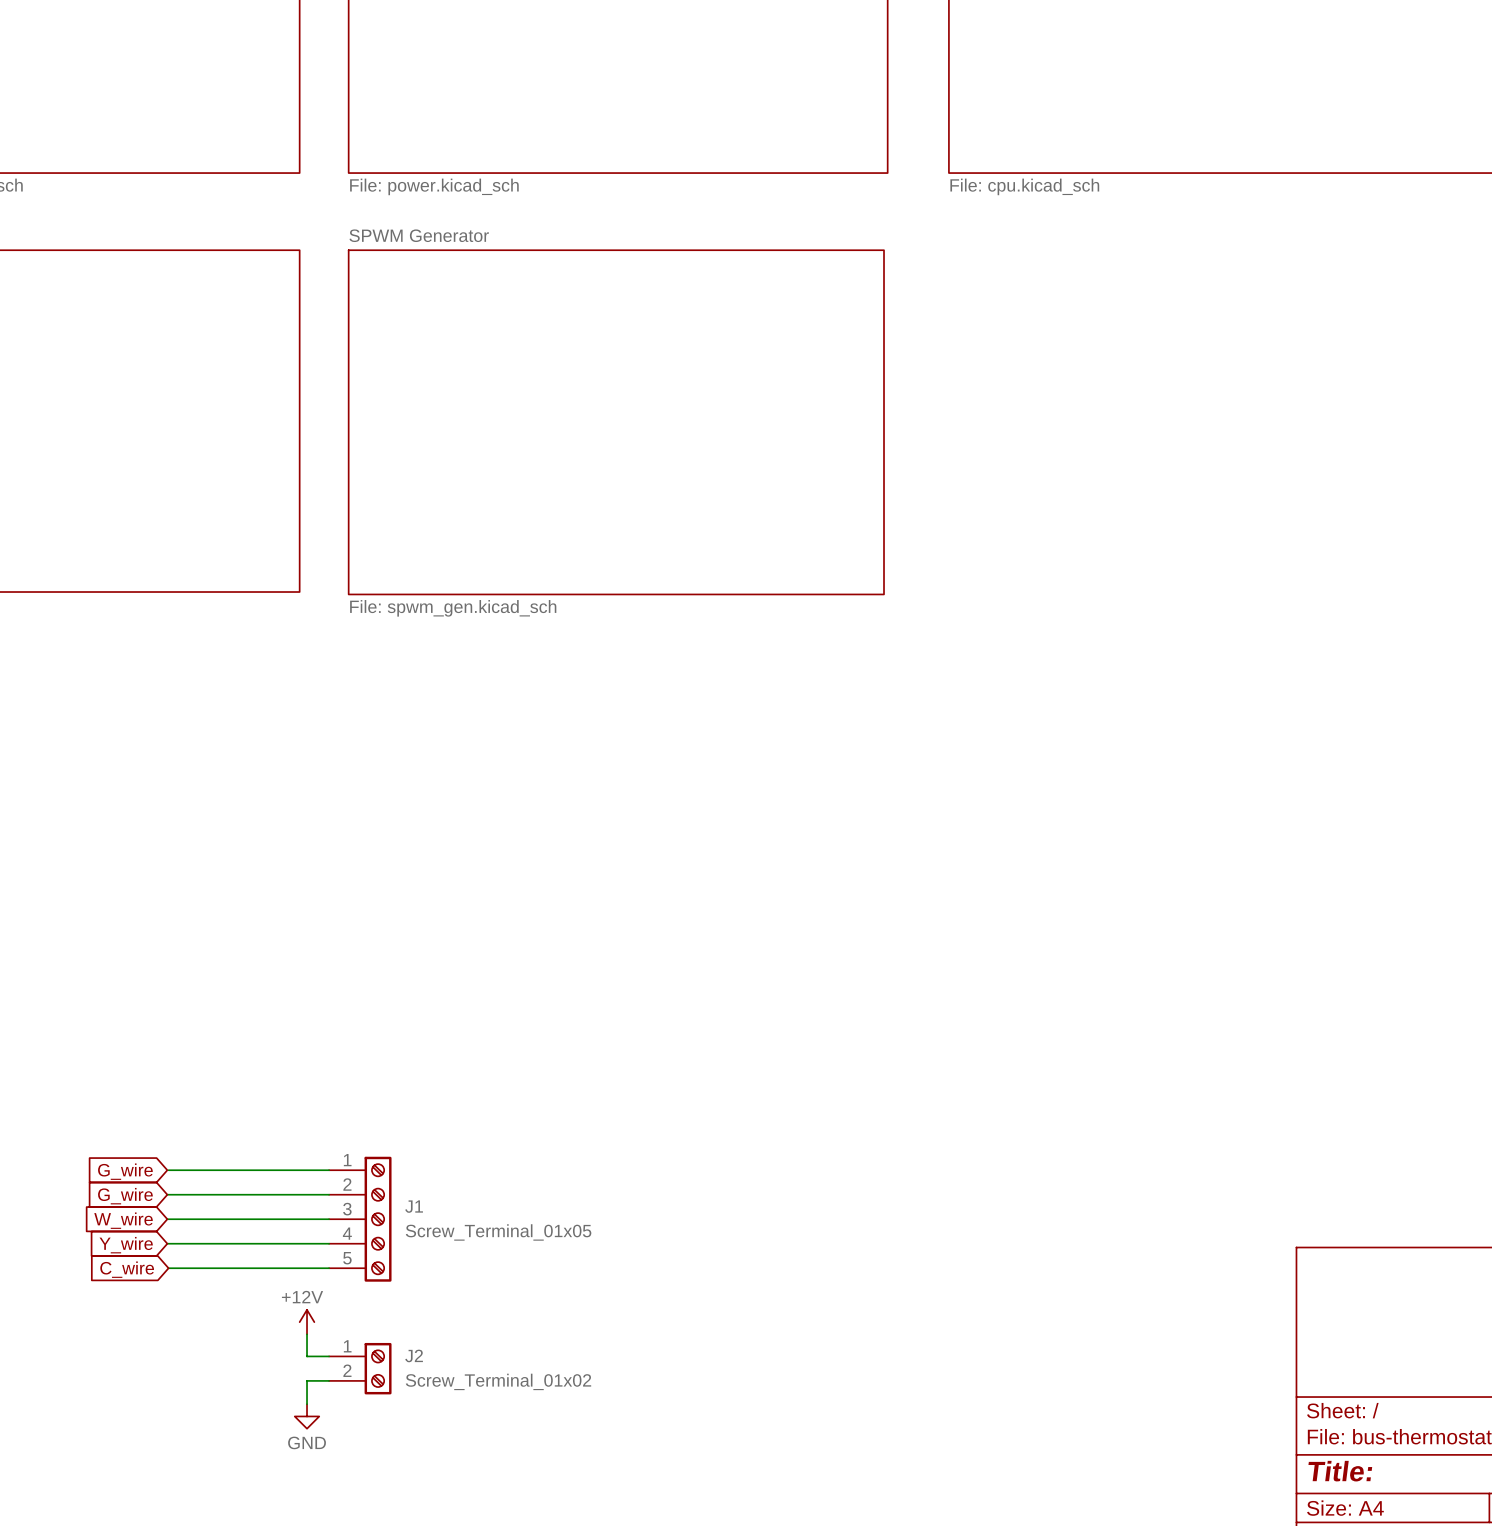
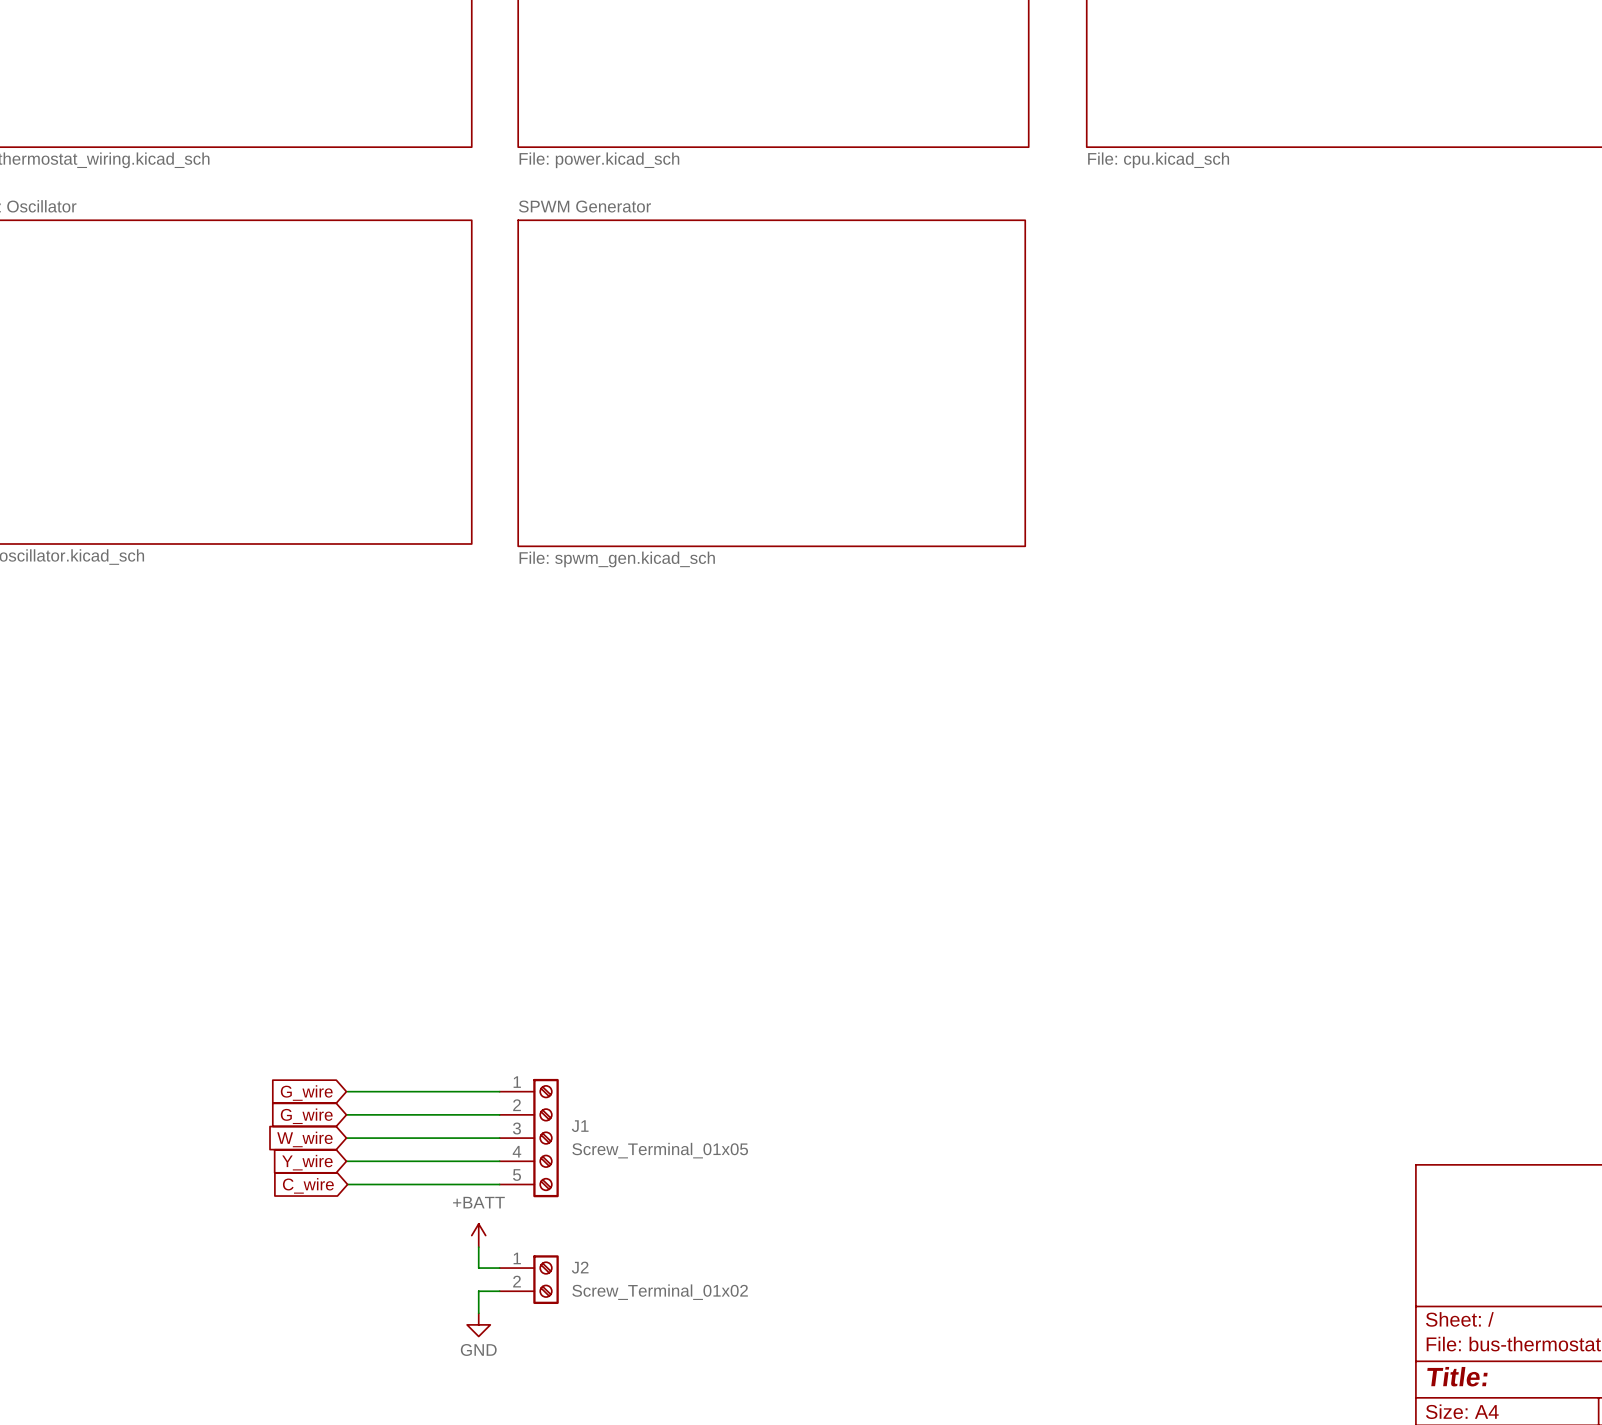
power symbol: +12V (307, 1322) -> +BATT (478, 1235)

